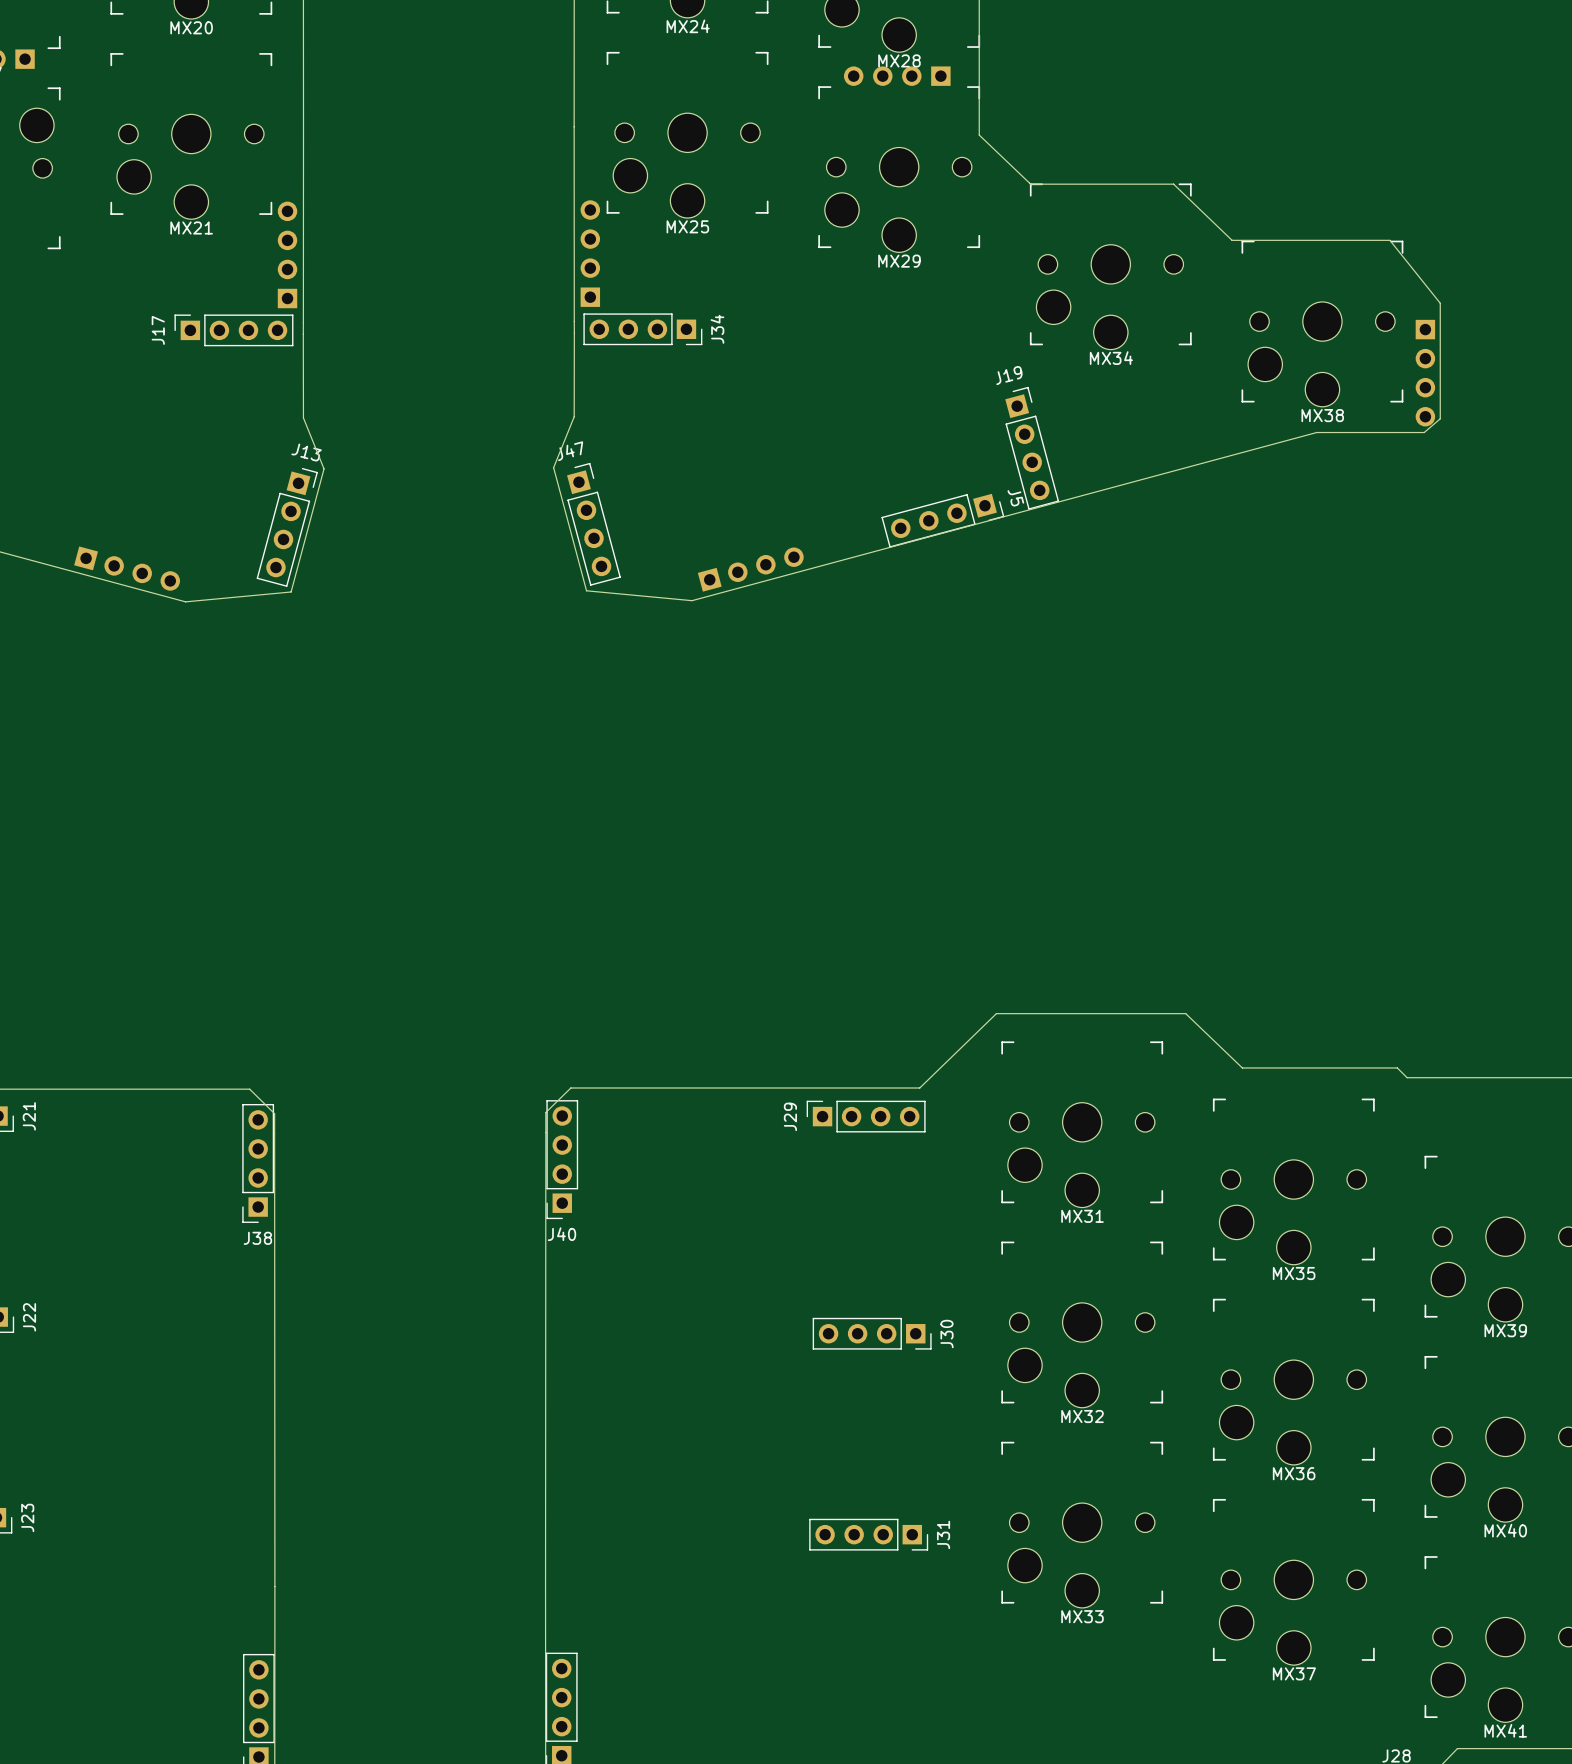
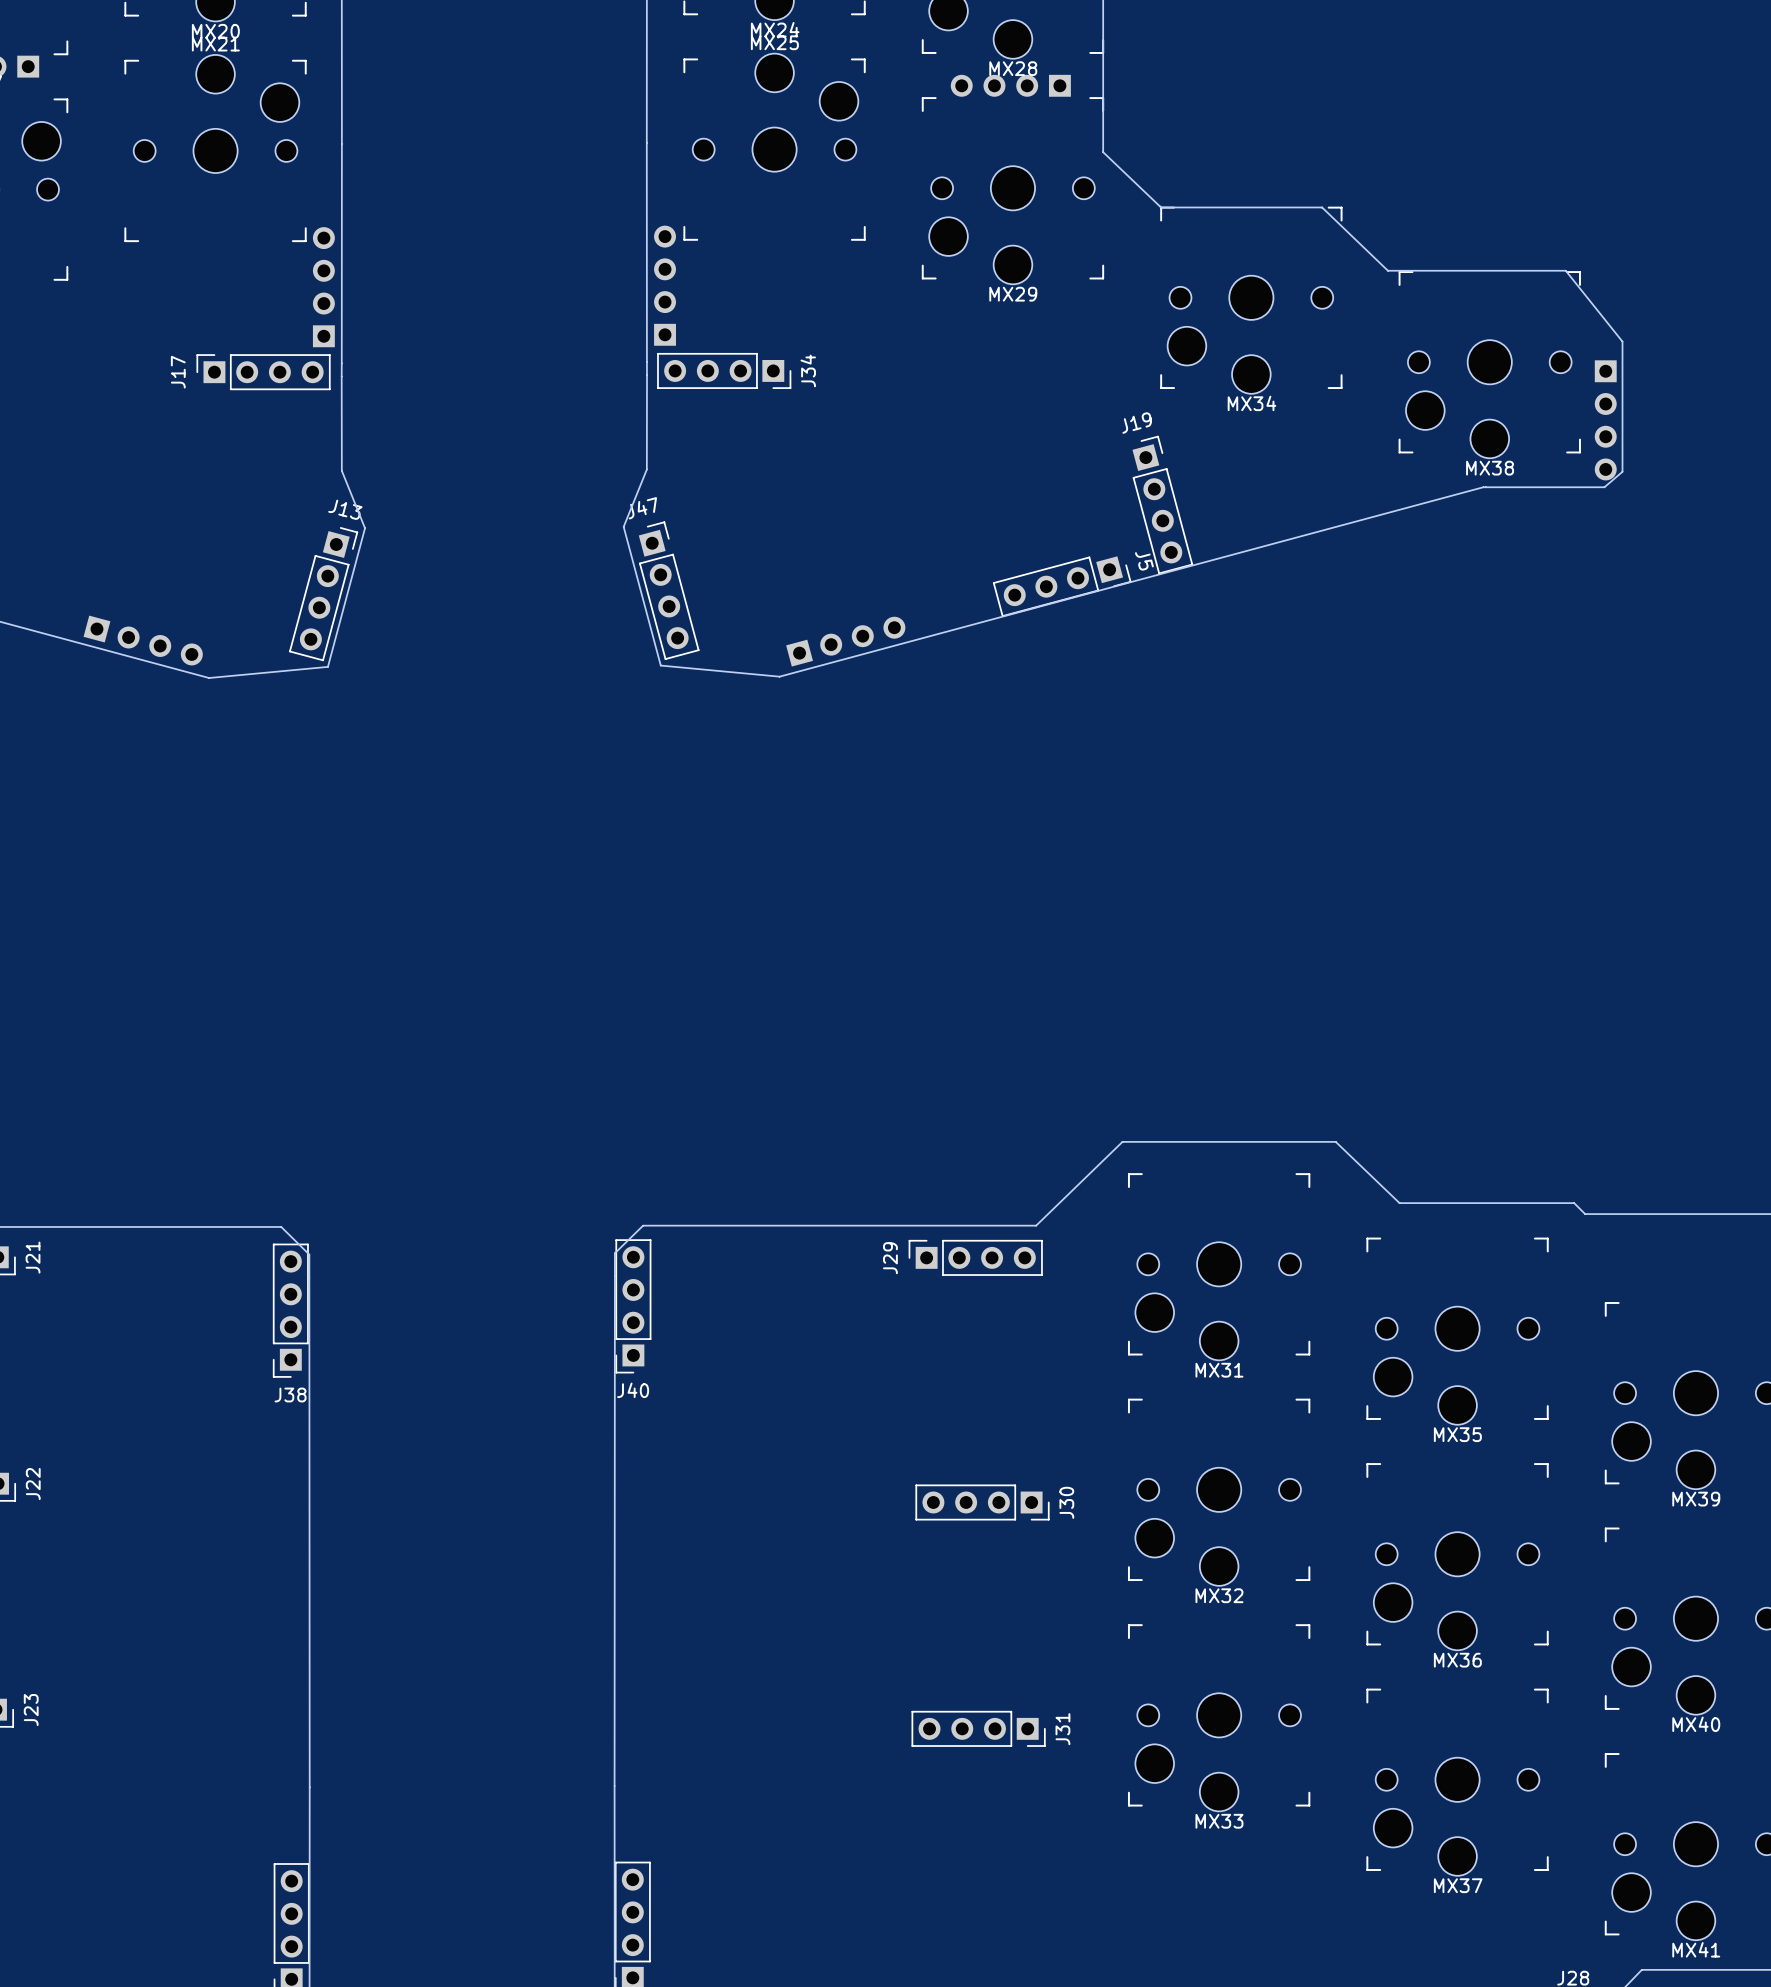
MX25 rotation: 0° (687, 134) -> 180° (774, 147)
MX21 rotation: 0° (191, 136) -> 180° (215, 148)

